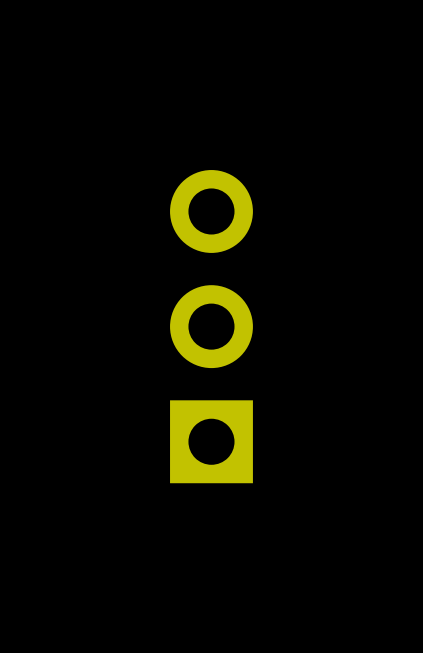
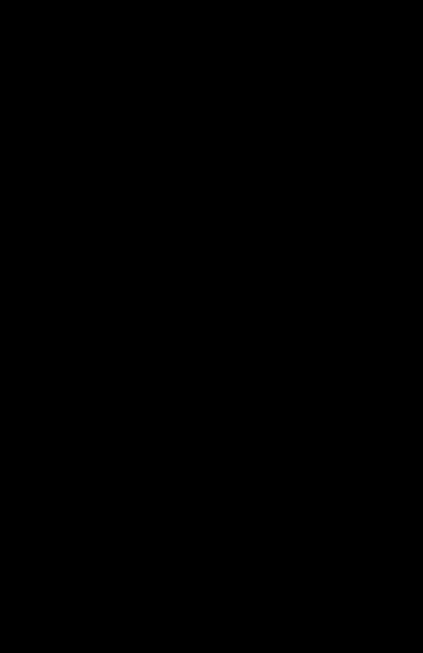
part: (211, 326) -> none

